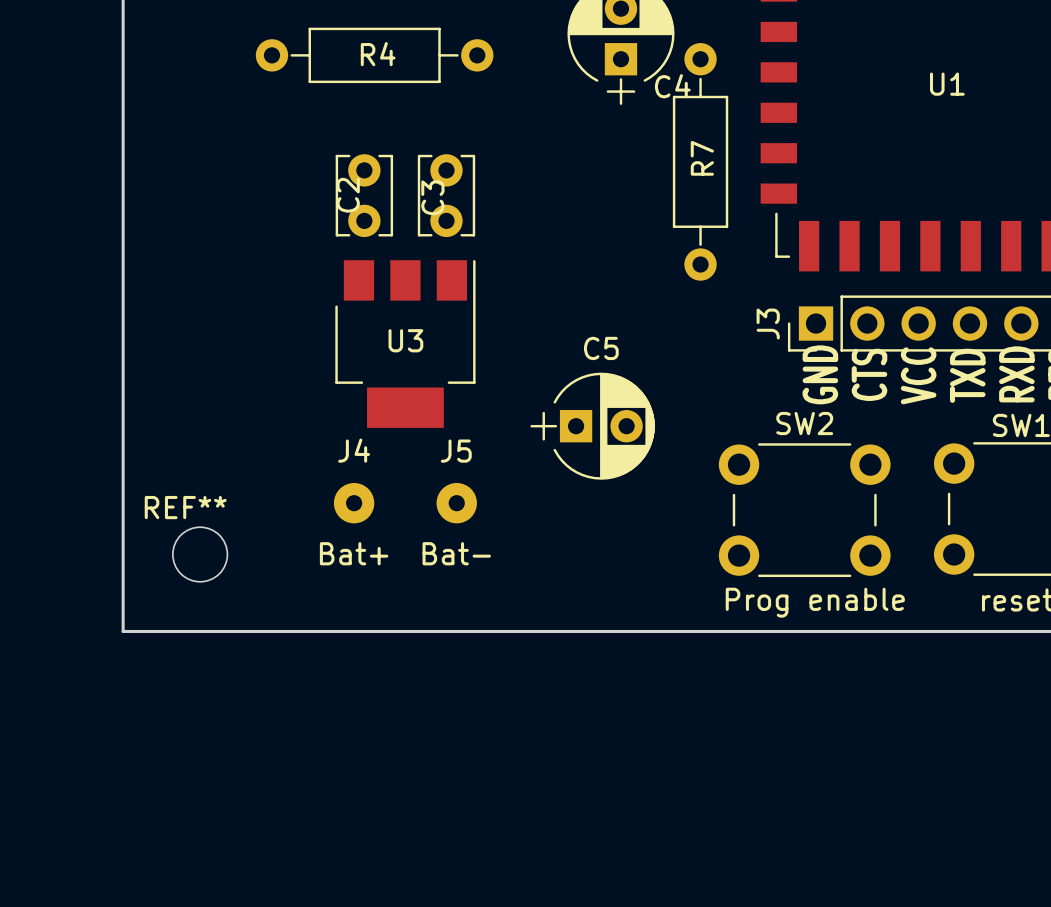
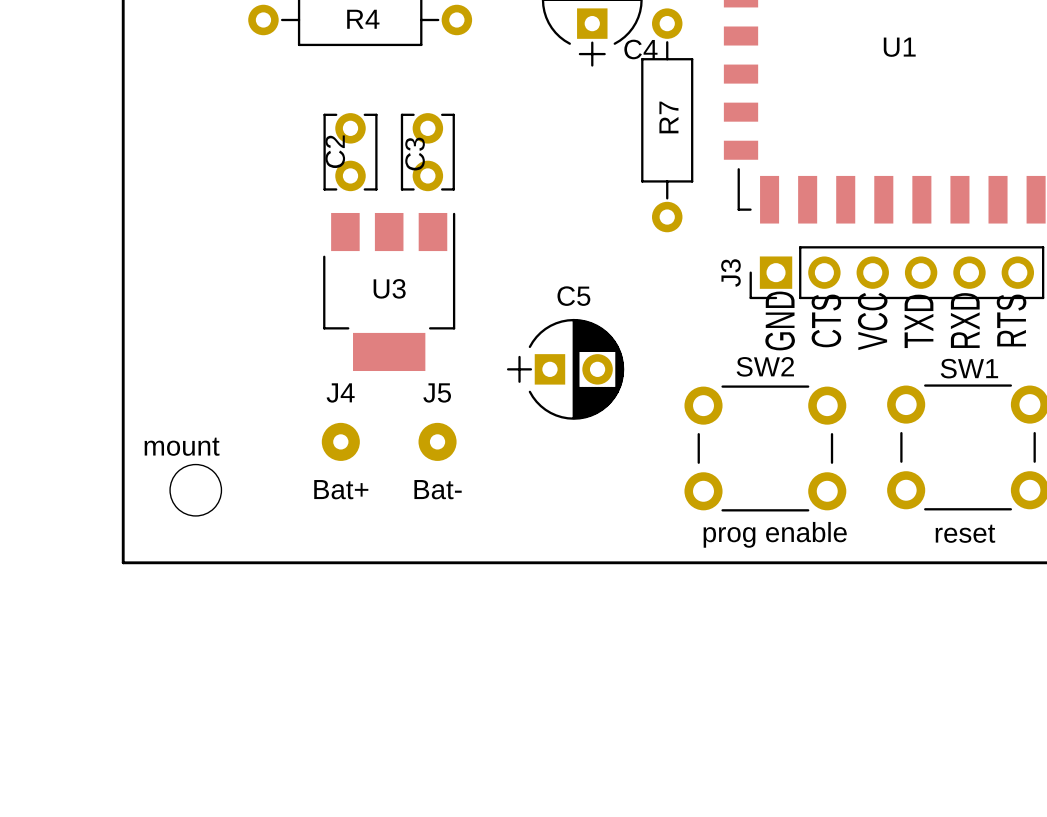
REF** name: REF** (185, 507) -> mount (182, 446)
SW2 value: Prog enable (815, 602) -> prog enable (775, 534)

